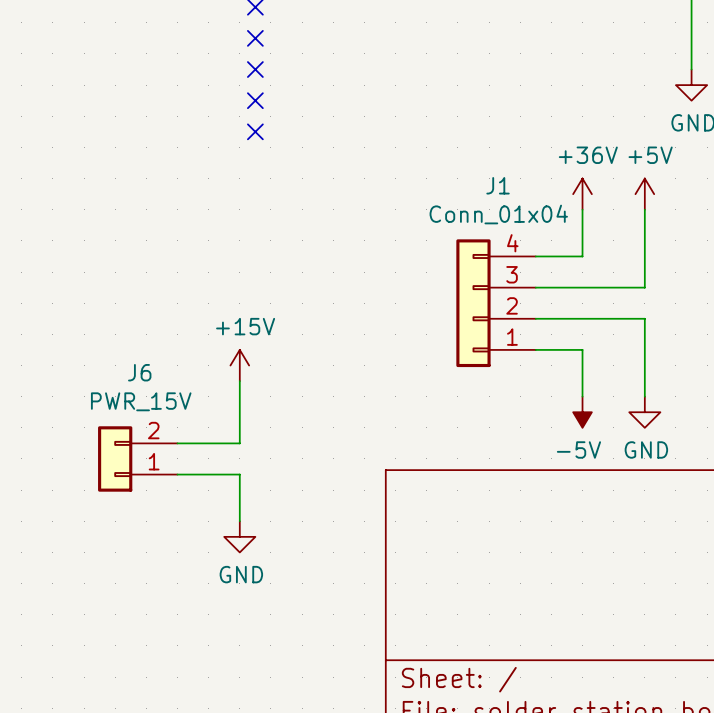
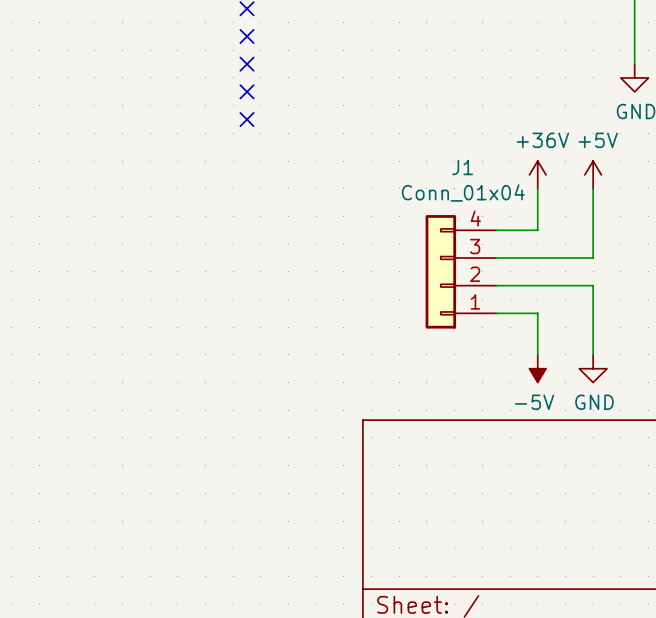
power symbol: +15V (239, 365) -> none
wire: (239, 381) (239, 443) (177, 443) -> none
J6: PWR_15V (137, 458) -> none
wire: (177, 474) (239, 474) (239, 521) -> none
power symbol: GND (239, 536) -> none

